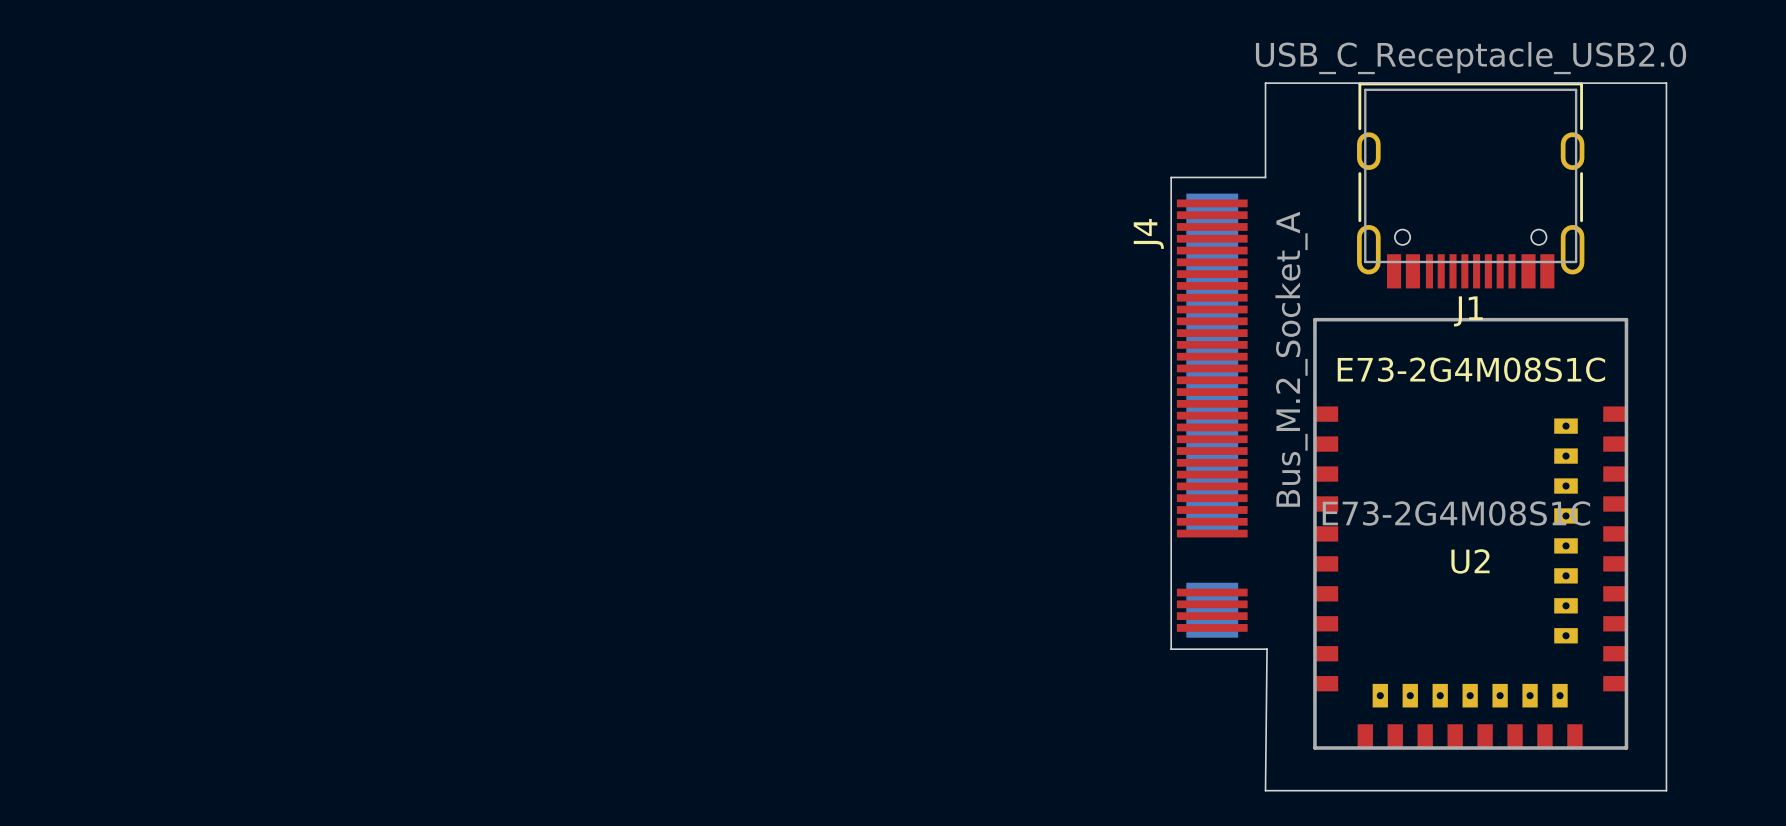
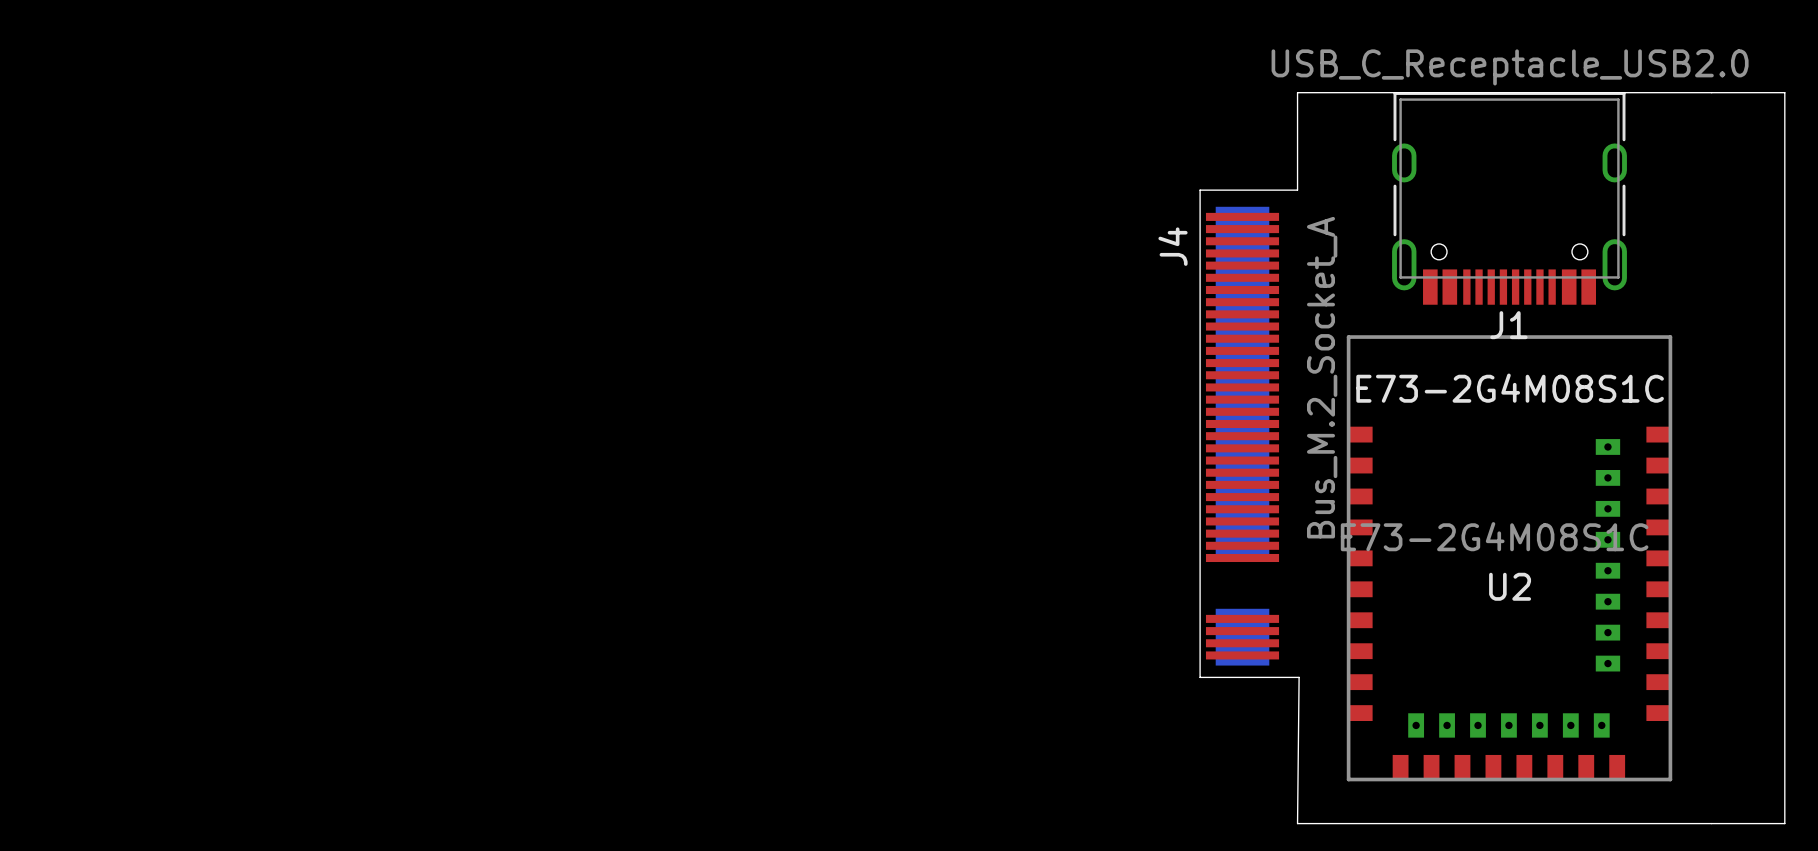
board edge: (1666, 83) (1666, 790) -> (1711, 92) (1784, 92) (1784, 823) (1711, 823)

